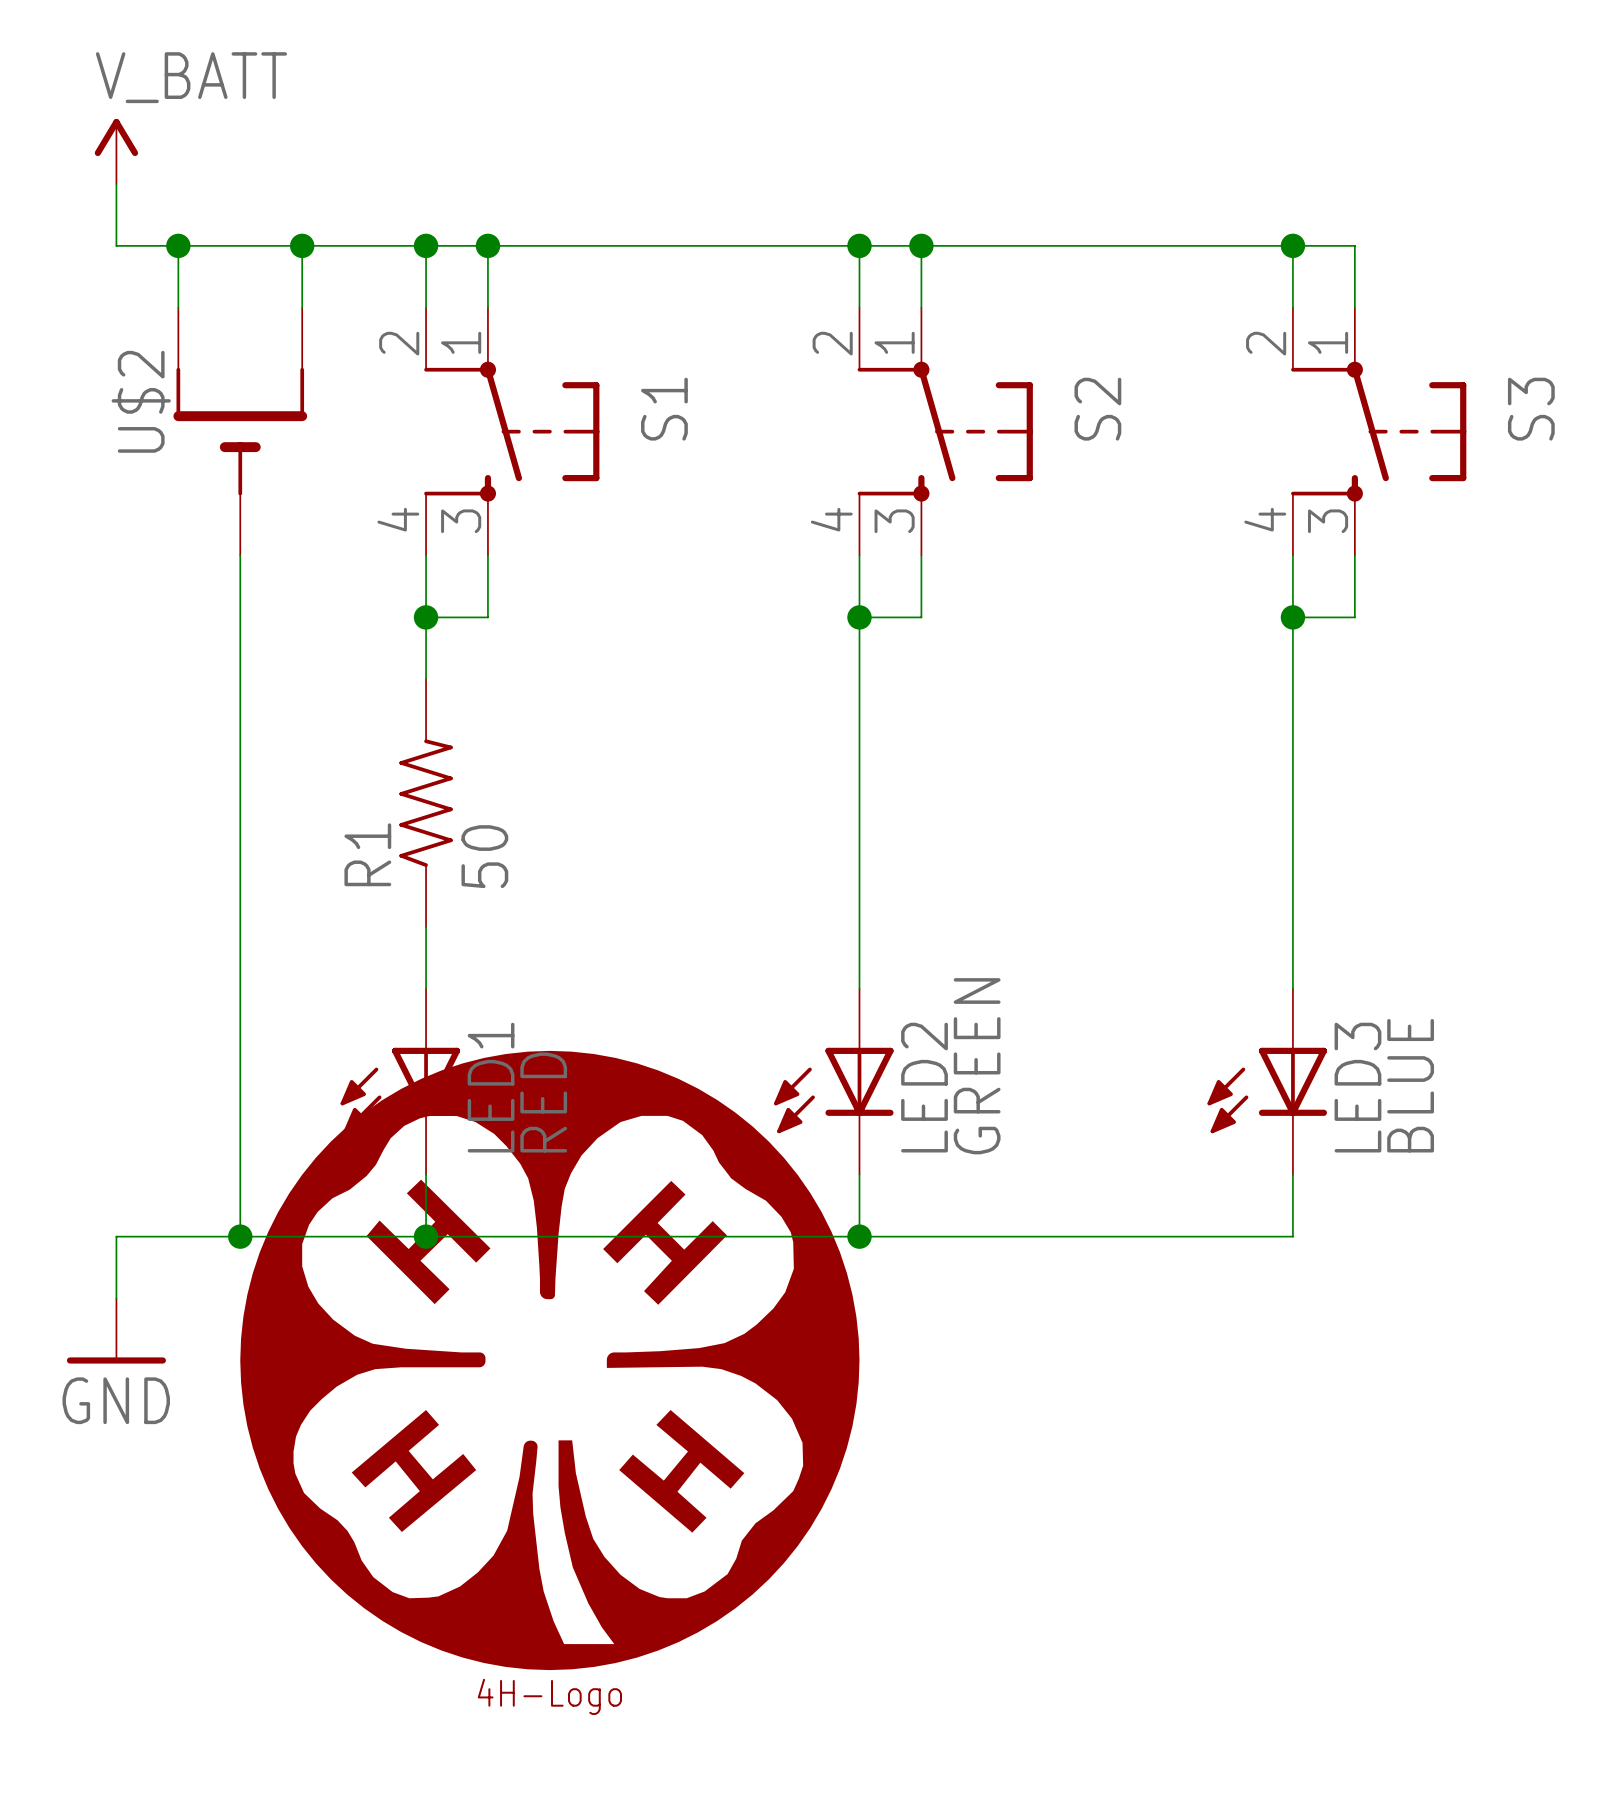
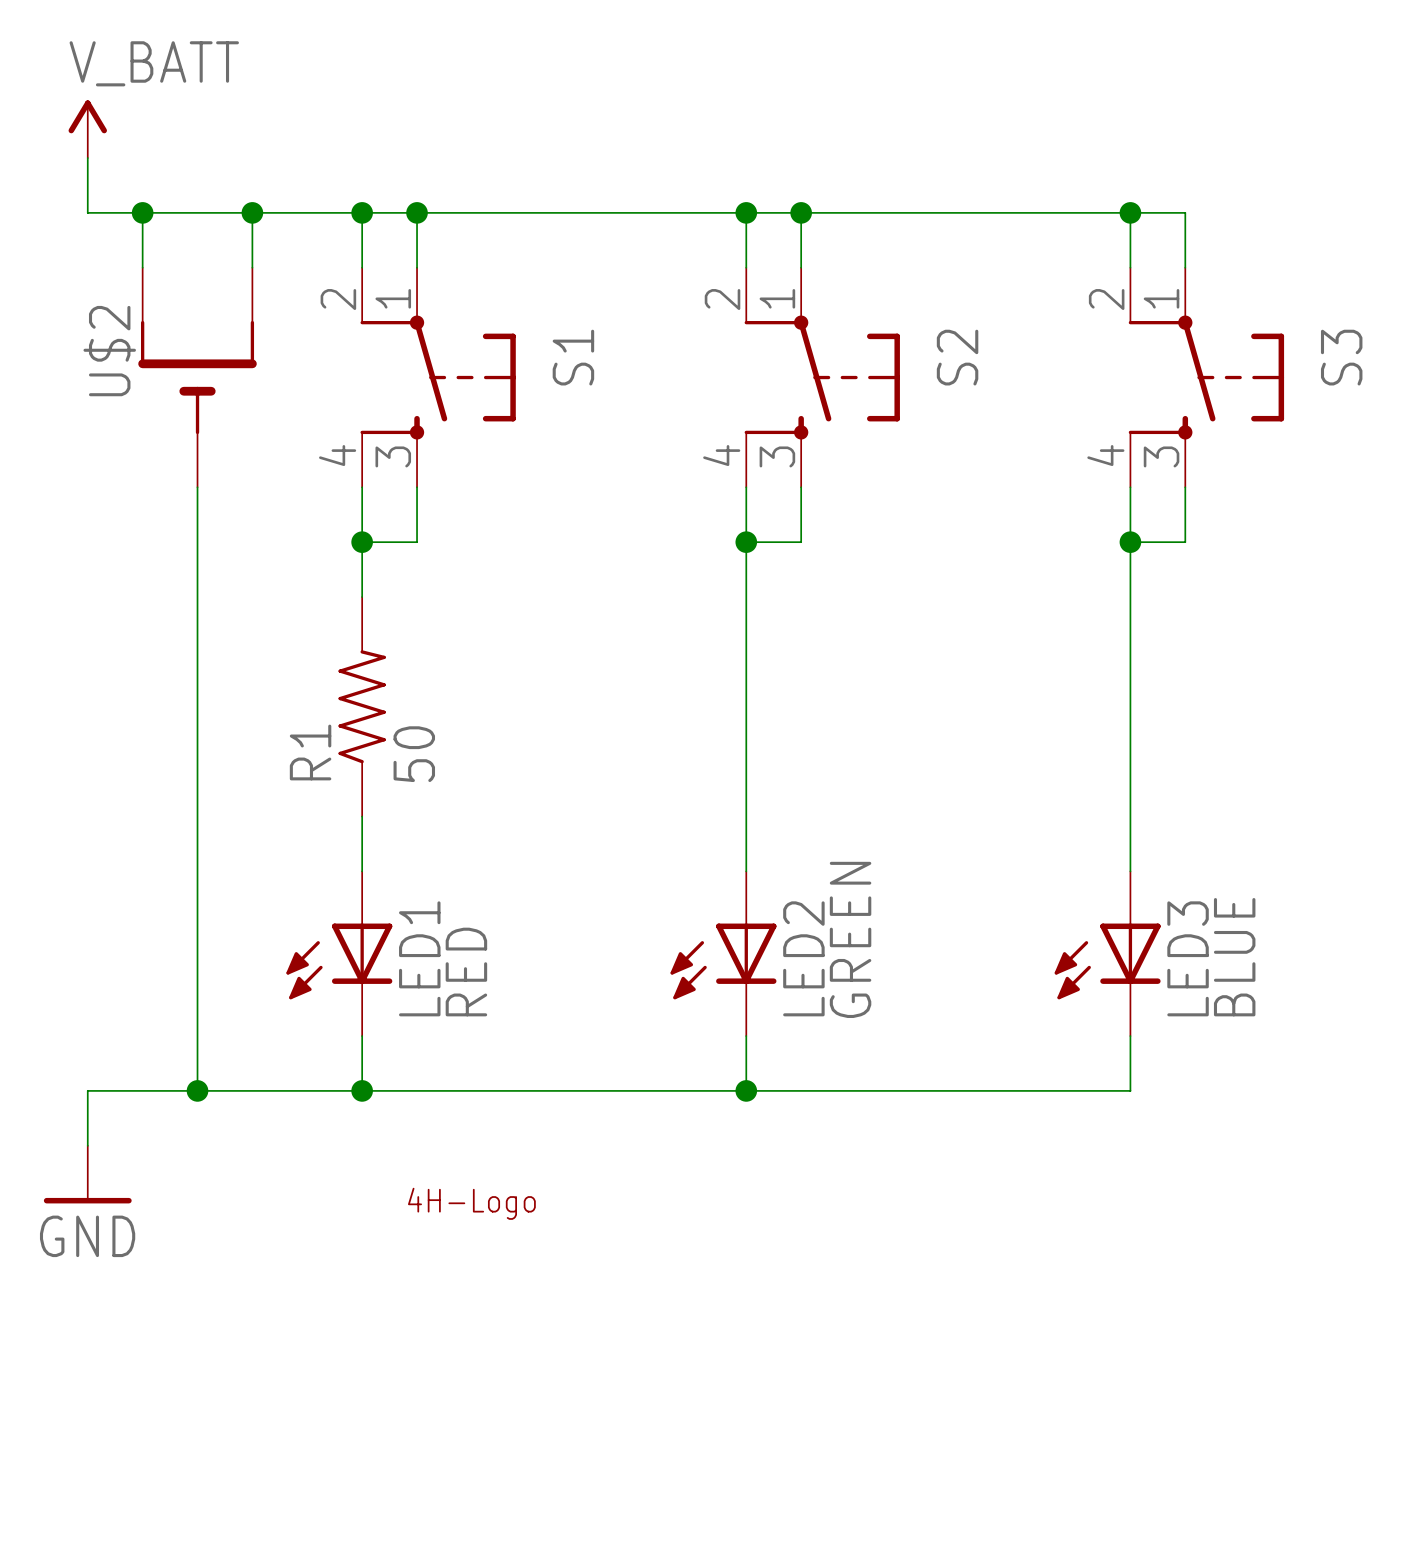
part symbol: [240, 1050, 860, 1671] -> [407, 1187, 536, 1220]

